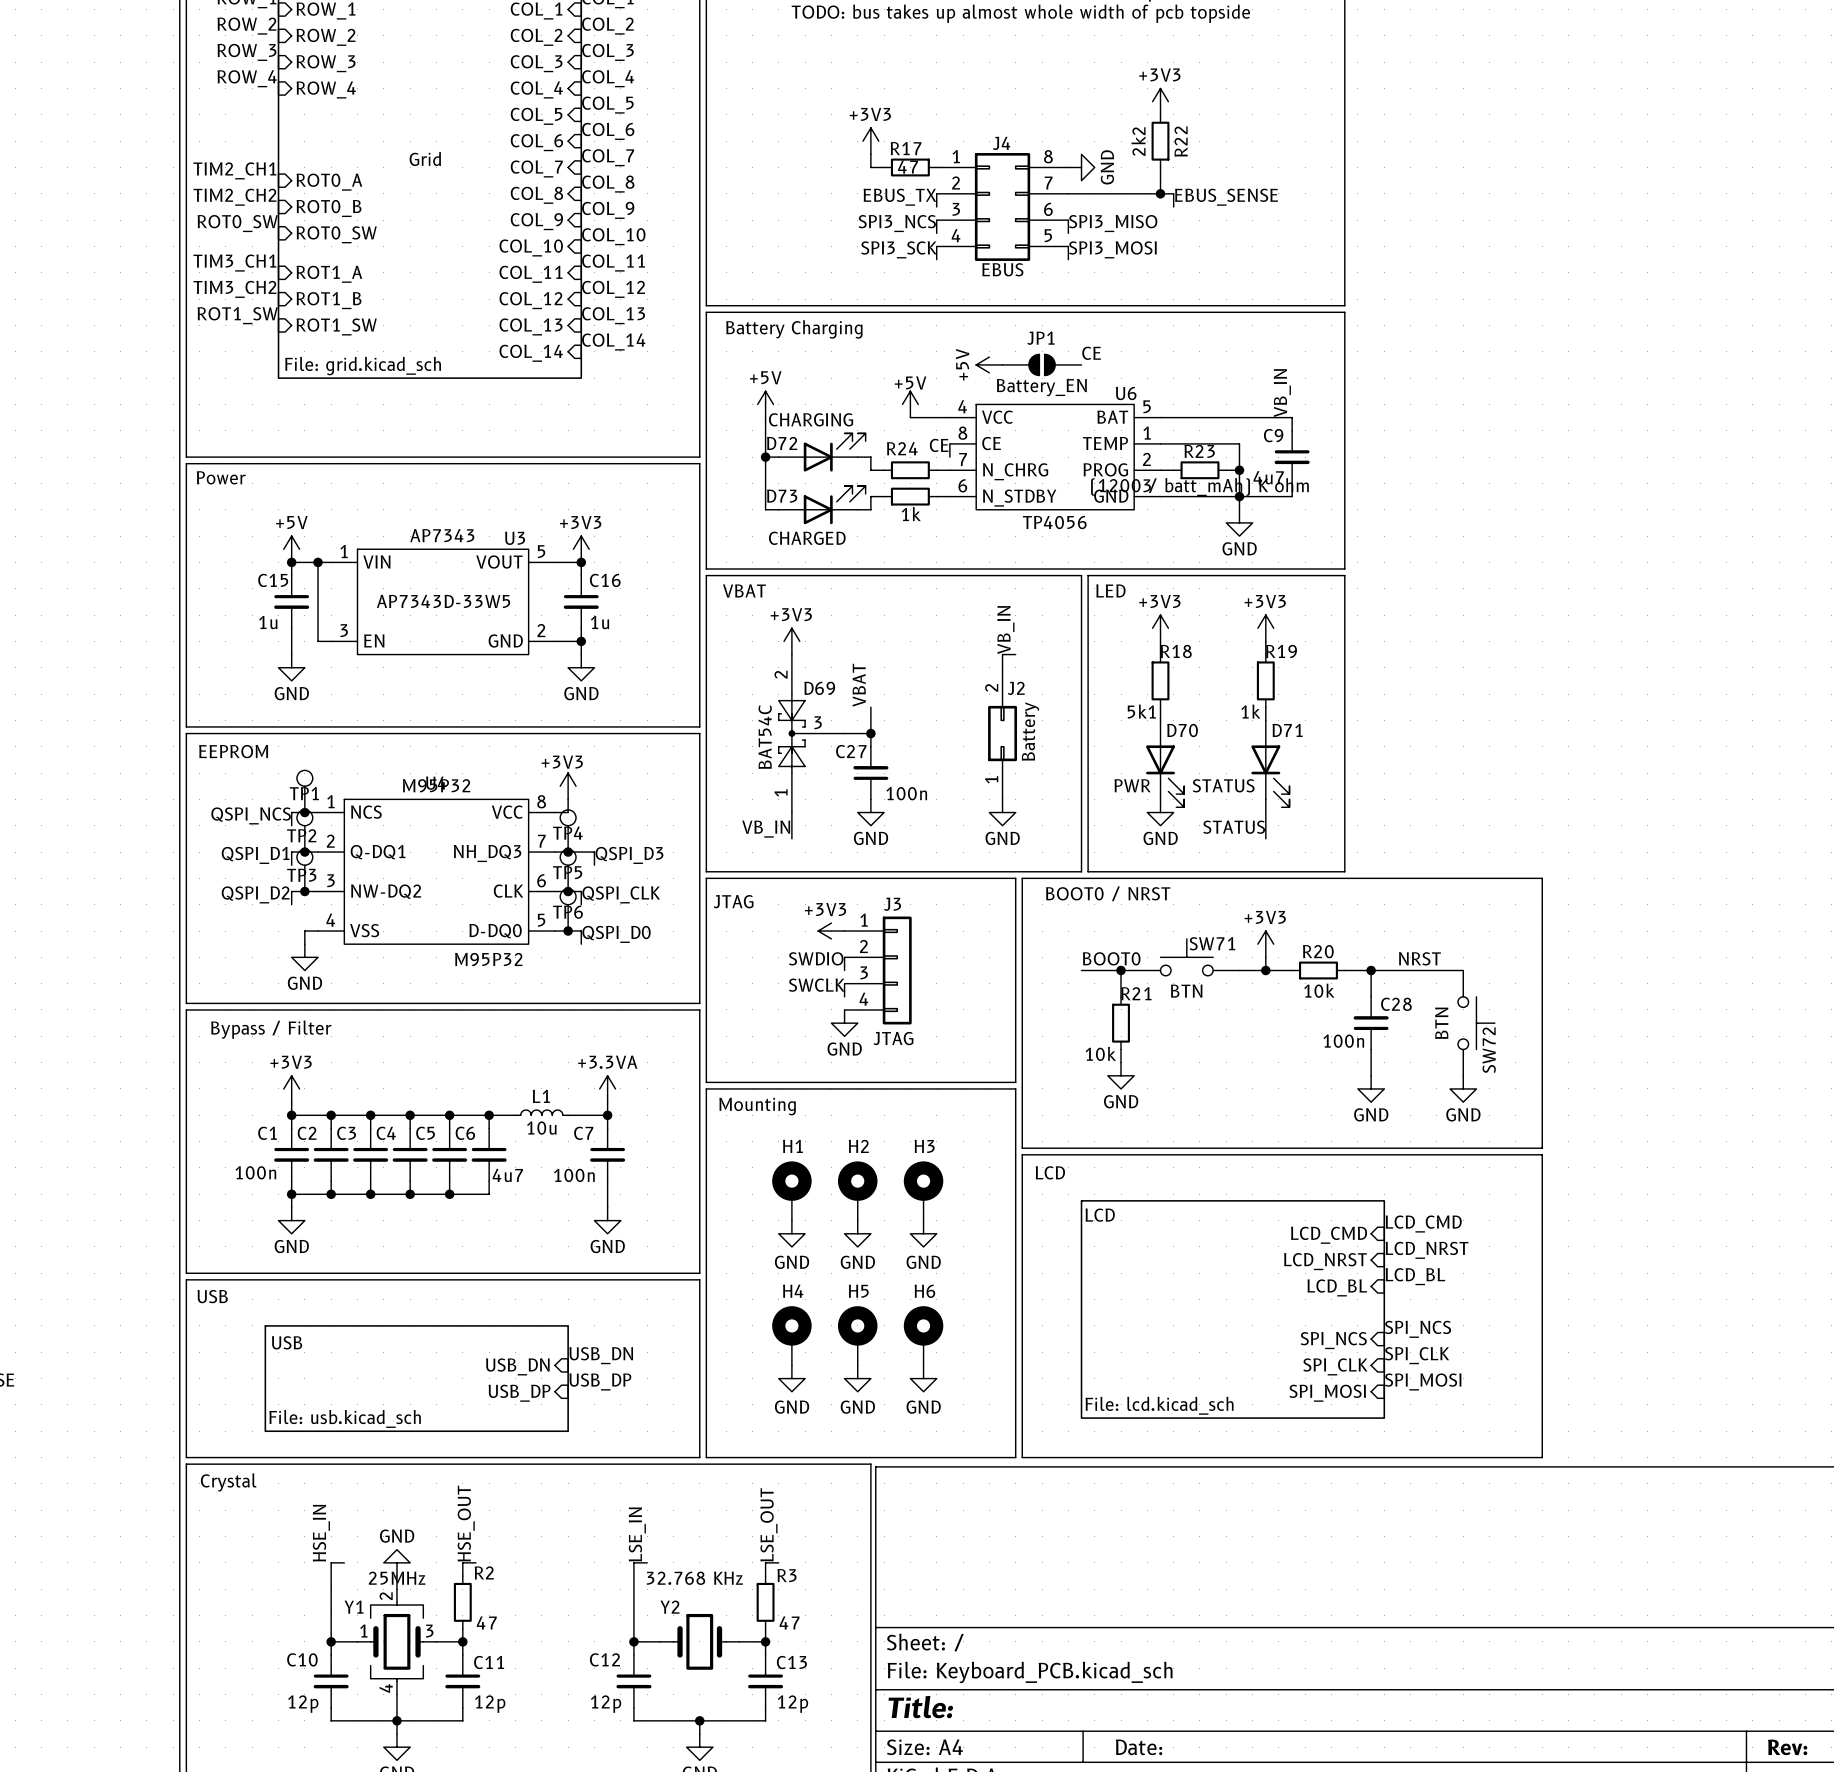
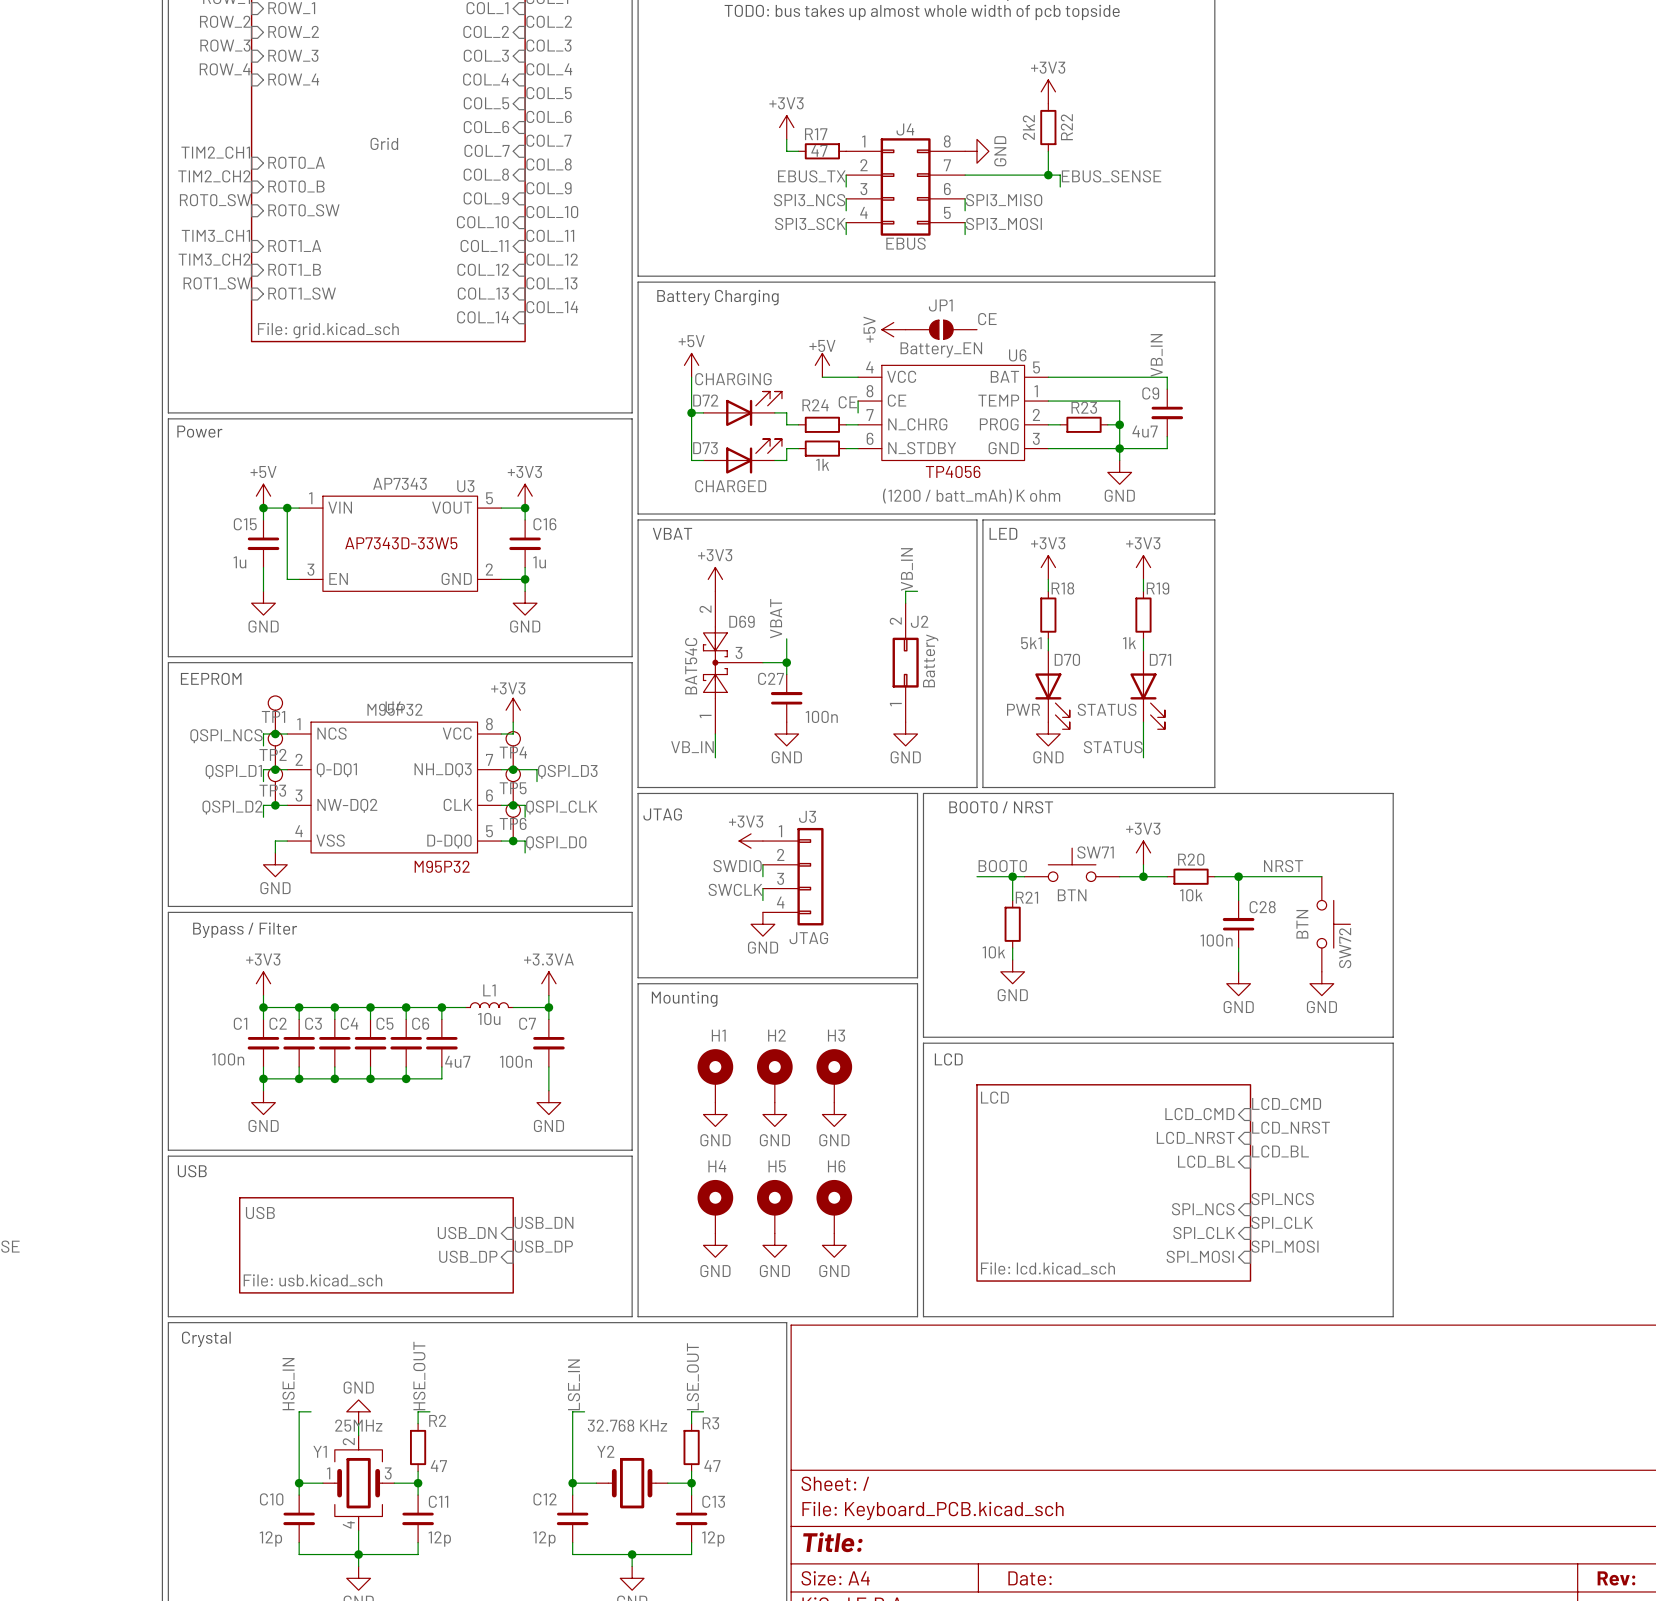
R23 value position: (1200 / batt_mAh) K ohm (1199, 487) -> (1200 / batt_mAh) K ohm (971, 496)

